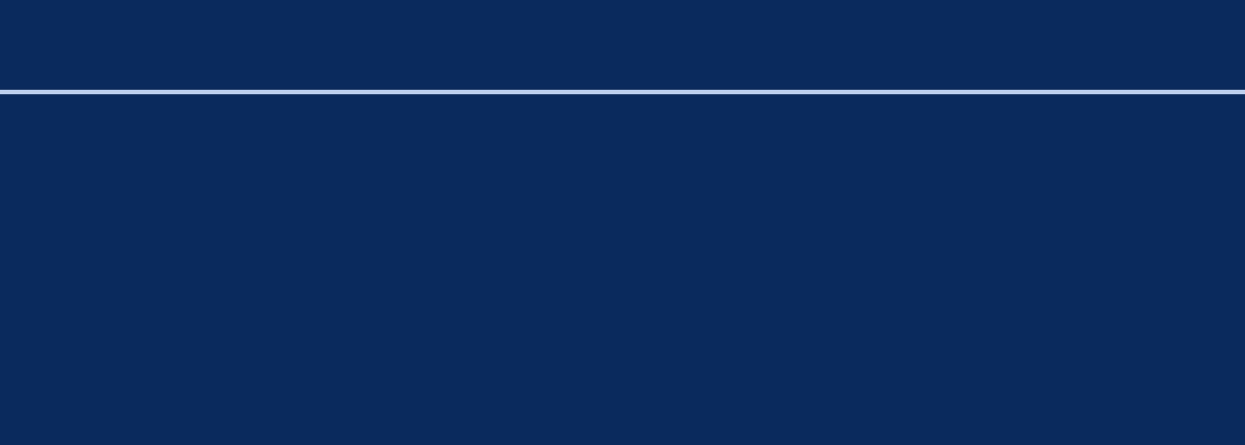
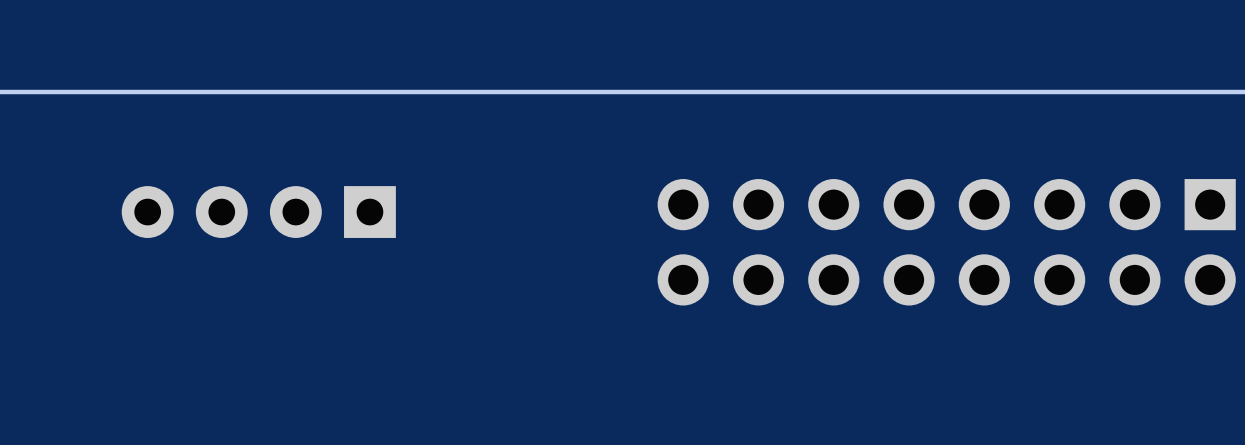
part: none -> (258, 212)
part: none -> (946, 242)

